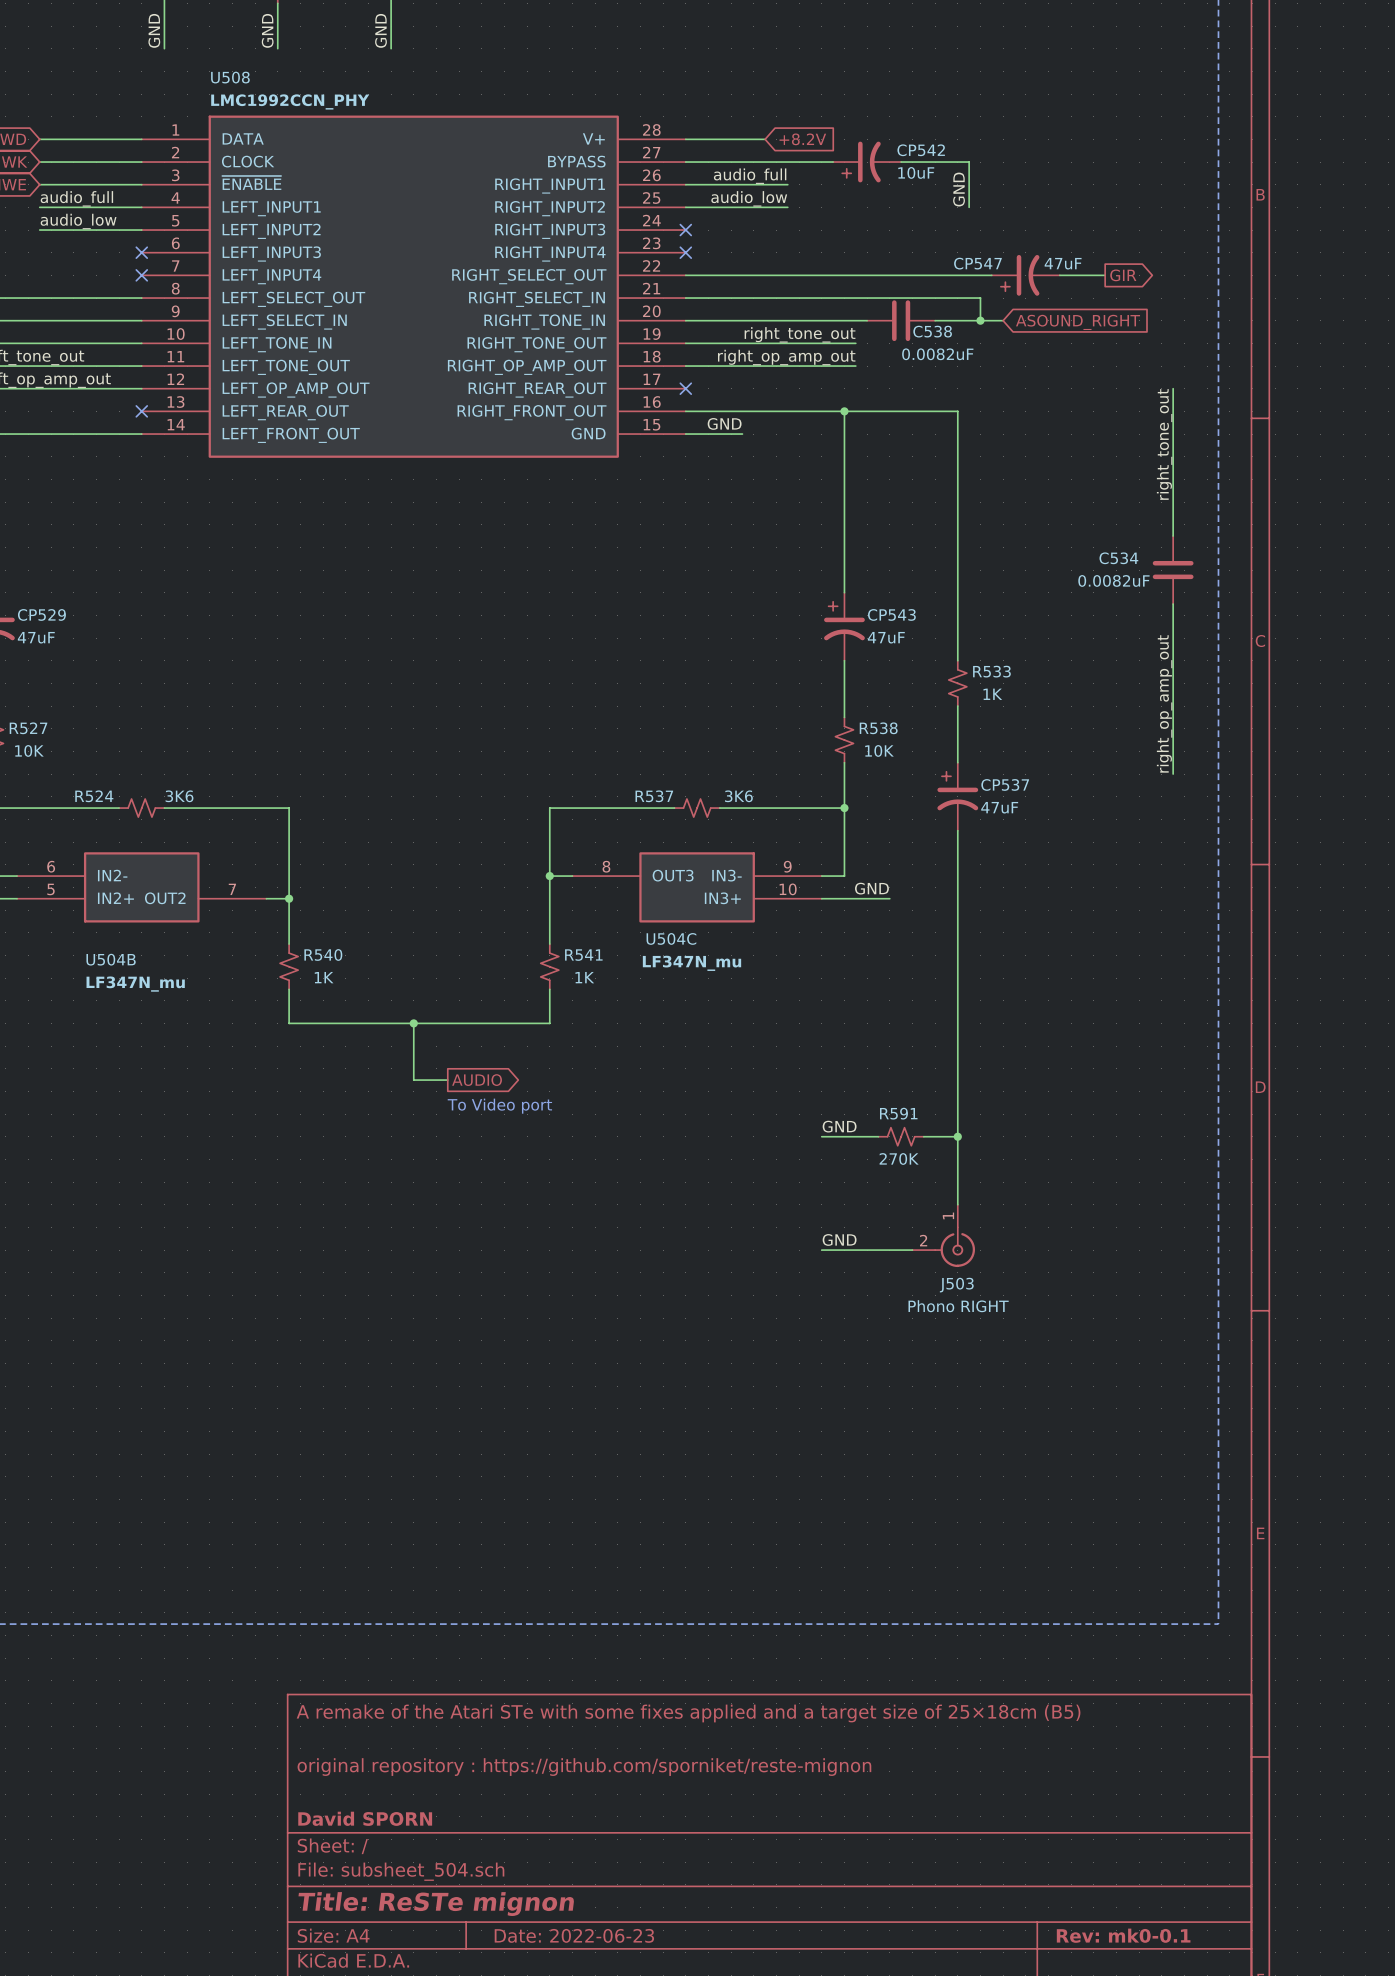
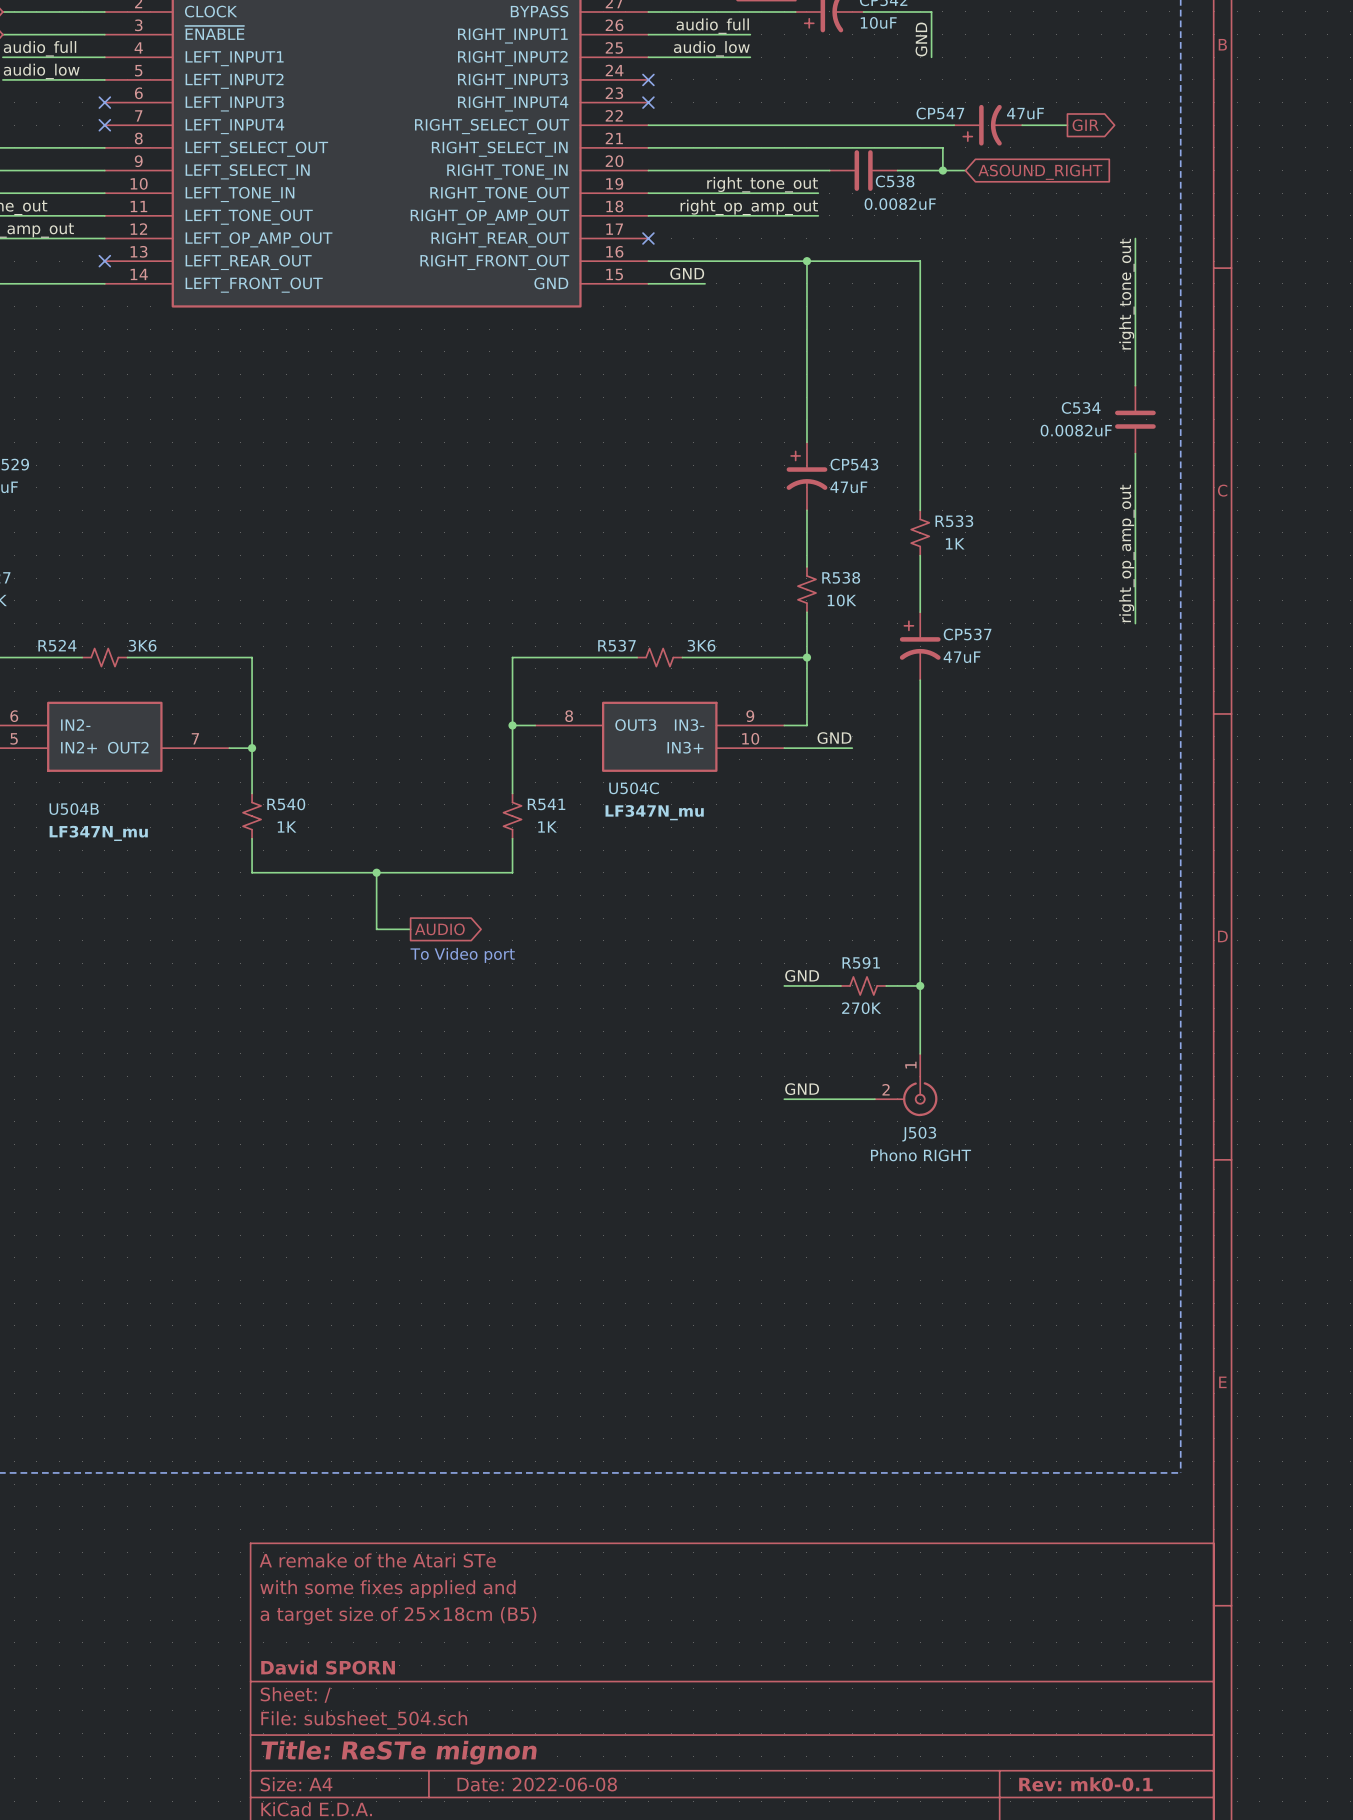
title block: A remake of the Atari STe with some fixes applied and a target size of 25×18cm (B5) (688, 1713) -> A remake of the Atari STe (377, 1560)
title block: none -> with some fixes applied and (387, 1589)
title block: original repository : https://github.com/sporniket/reste-mignon (584, 1767) -> a target size of 25×18cm (B5) (398, 1615)
title block: Date: 2022-06-23 (574, 1935) -> Date: 2022-06-08 (537, 1784)

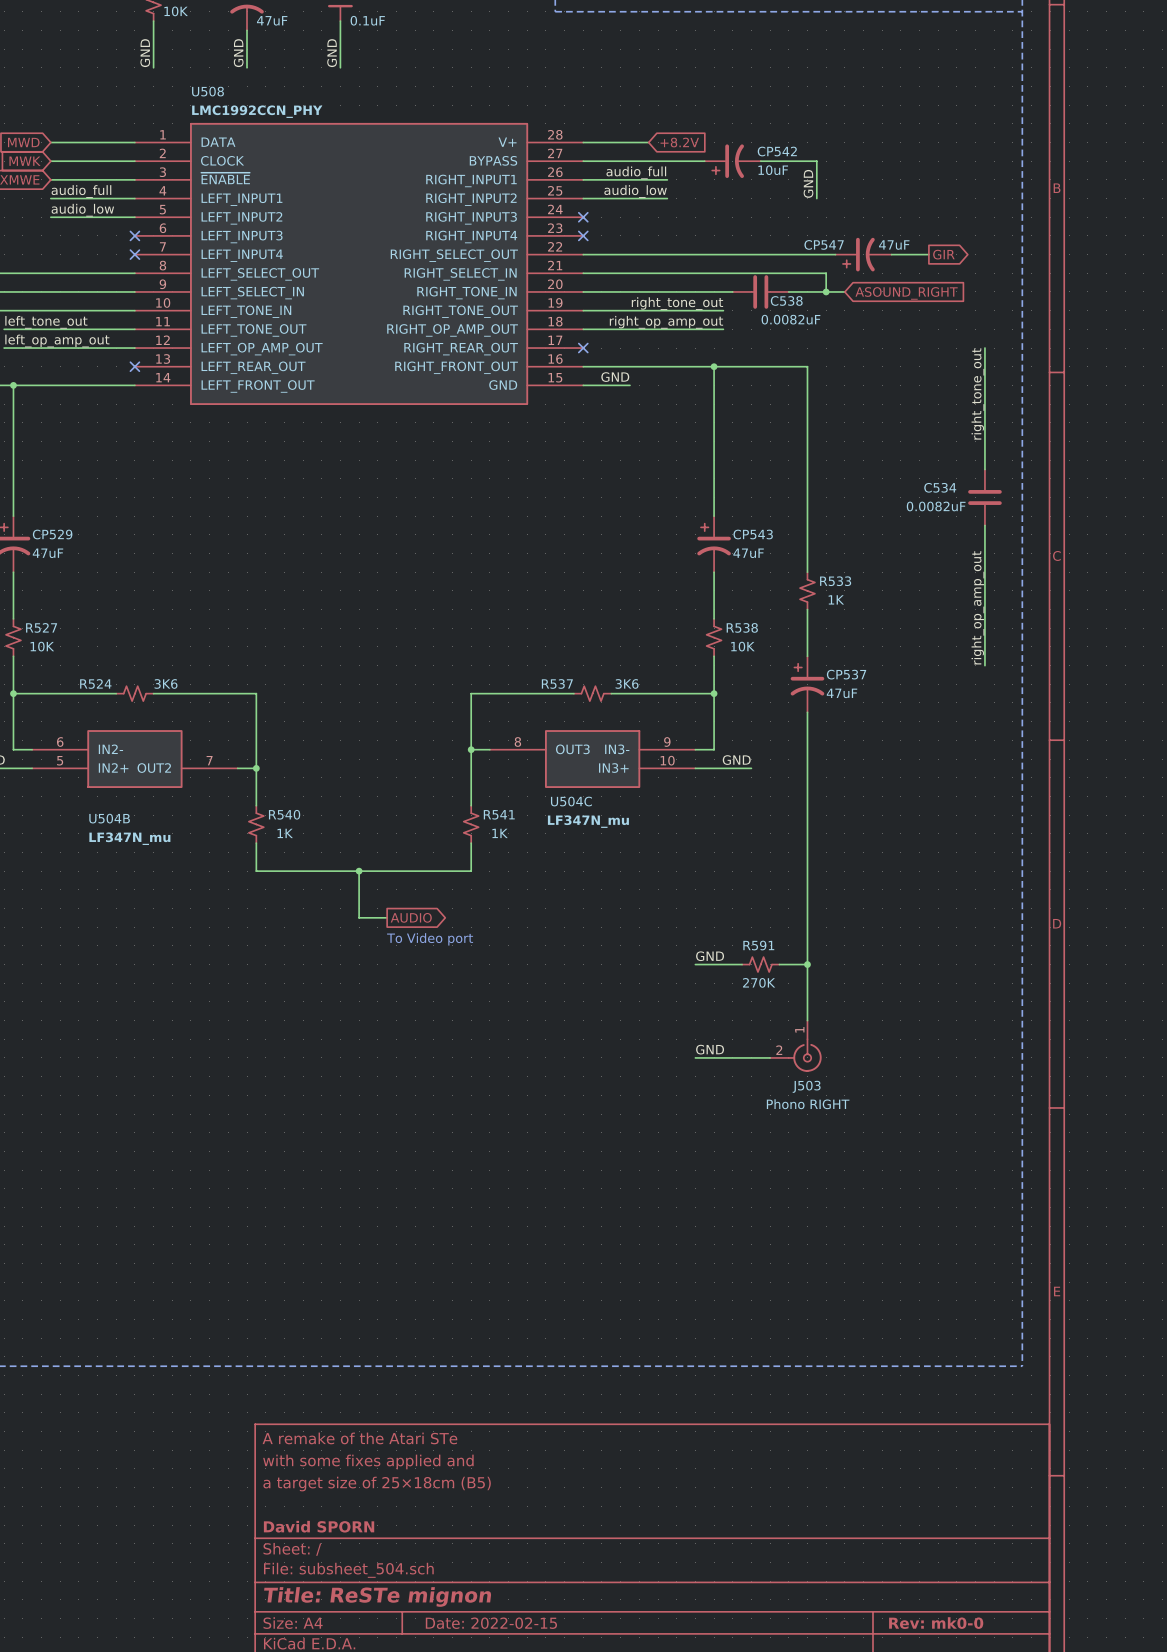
title block: Date: 2022-06-08 (537, 1784) -> Date: 2022-02-15 (491, 1623)
title block: Rev: mk0-0.1 (1085, 1784) -> Rev: mk0-0 (936, 1623)

